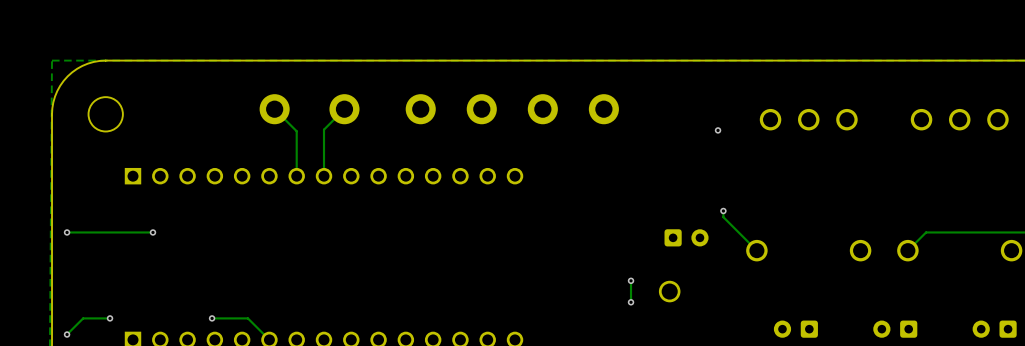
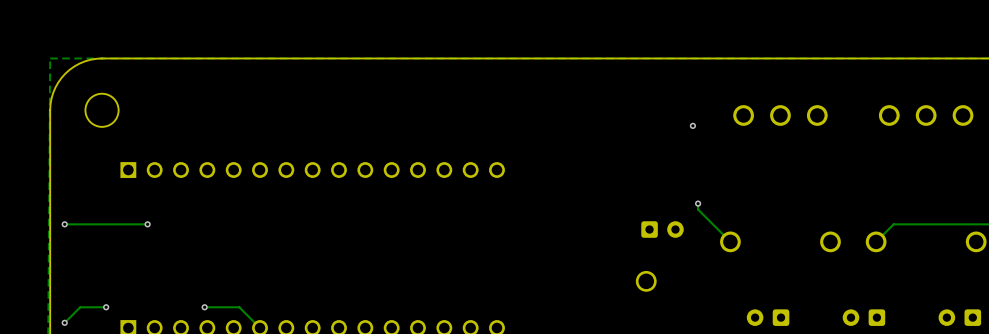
track: (274, 109) (296, 131) (296, 176) -> none
part: (274, 109) -> none
track: (344, 109) (324, 129) (324, 176) -> none
part: (344, 109) -> none
part: (420, 109) -> none
part: (481, 109) -> none
part: (542, 109) -> none
part: (603, 109) -> none
track: (631, 280) (631, 302) -> none
via: (631, 280) -> none
via: (631, 302) -> none

